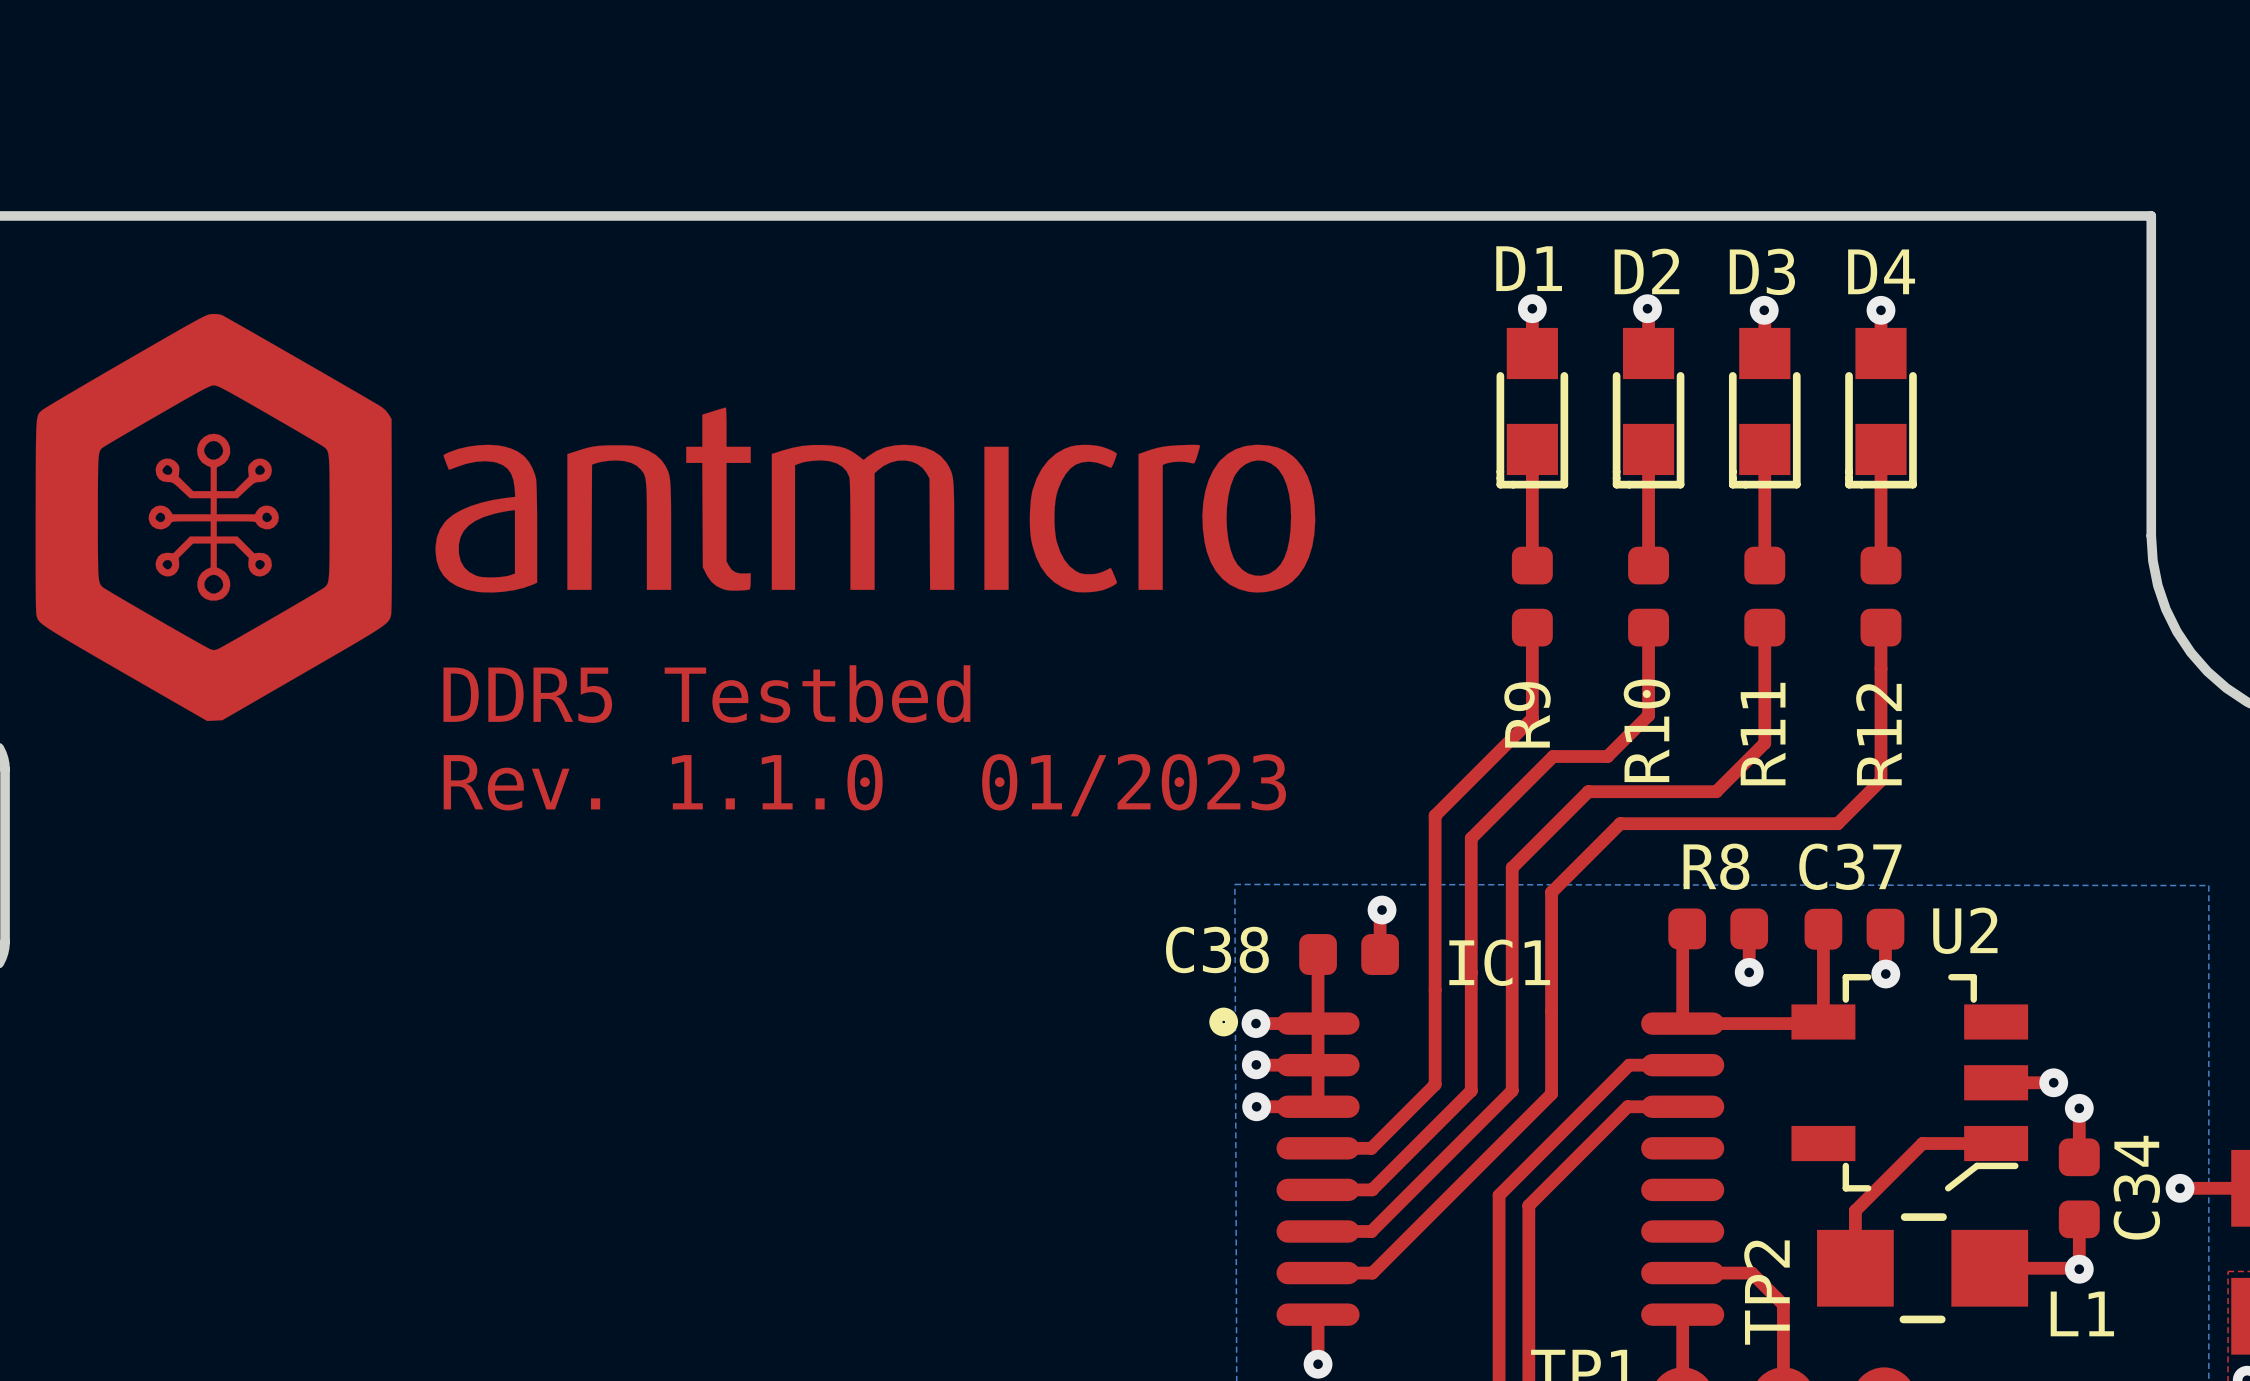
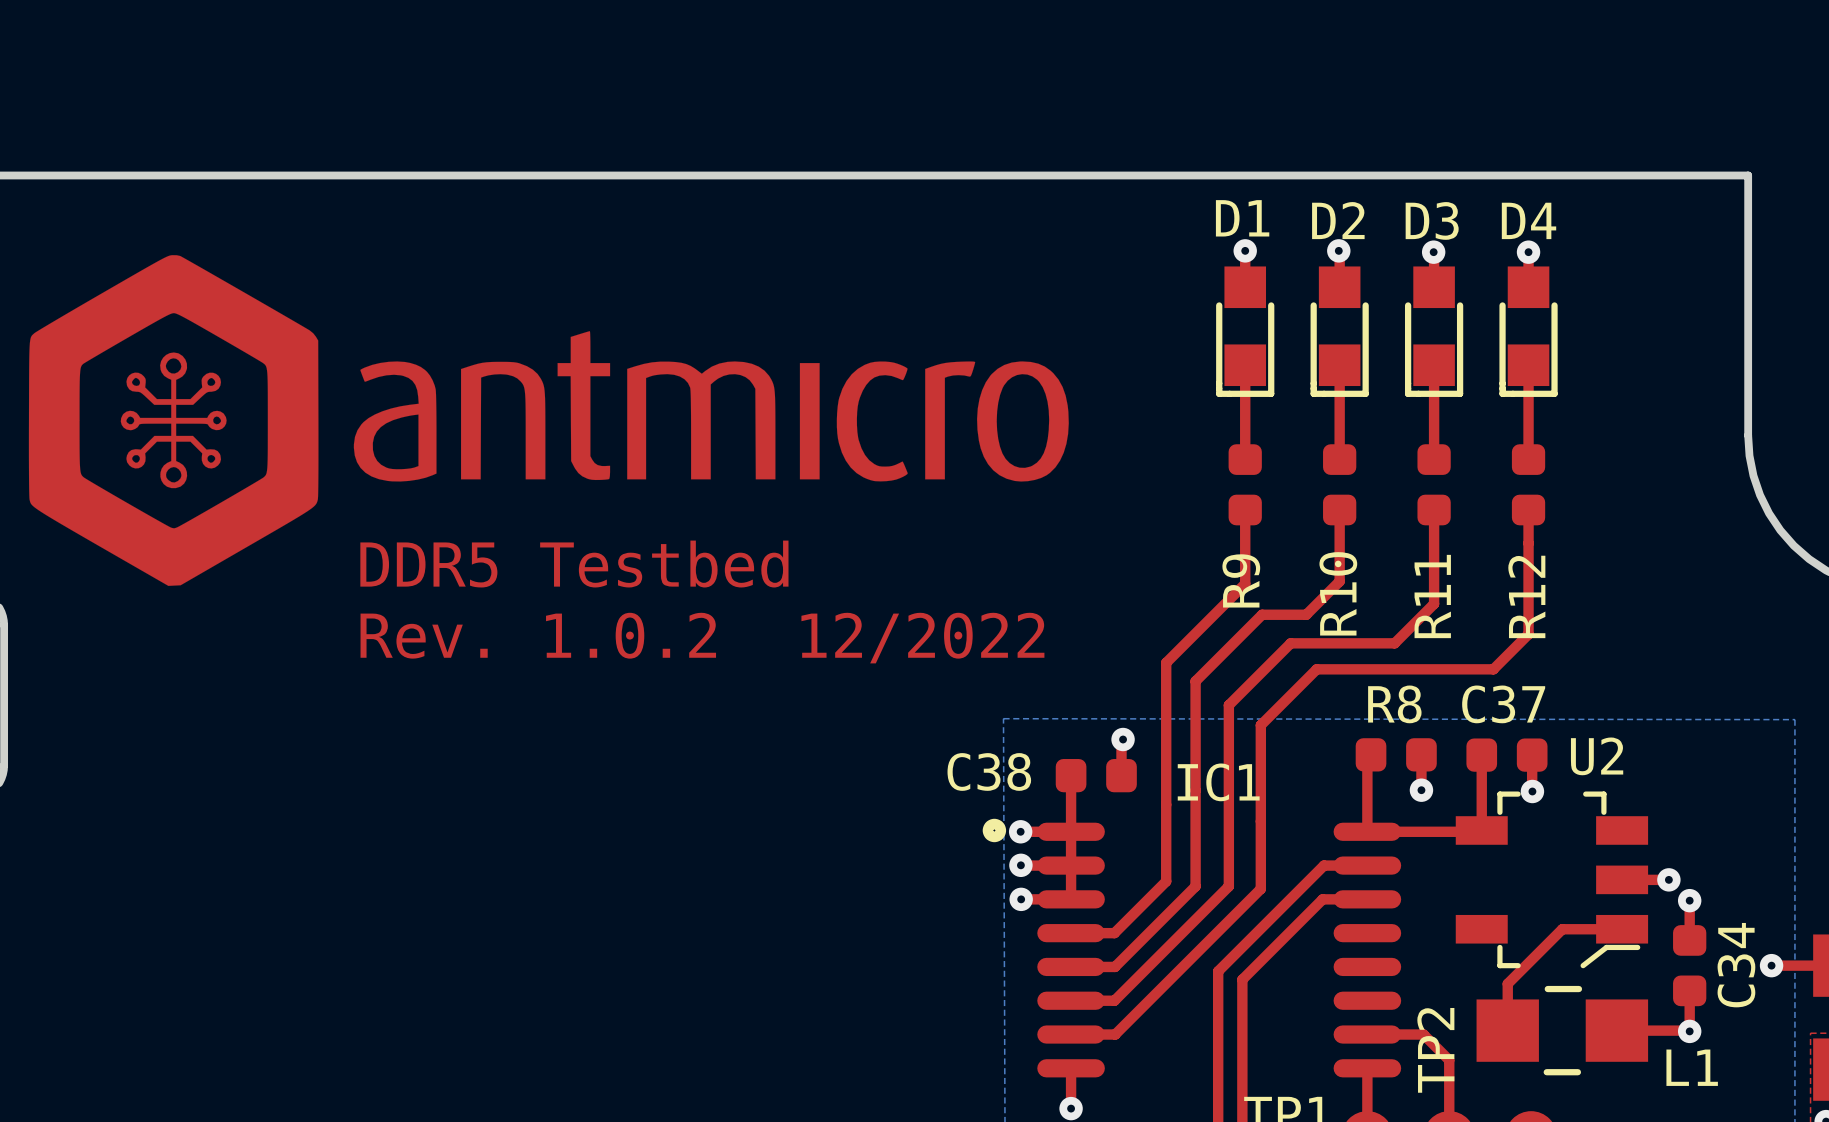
text: Rev. 1.1.0 01/2023 (864, 785) -> Rev. 1.0.2 12/2022 (702, 638)

